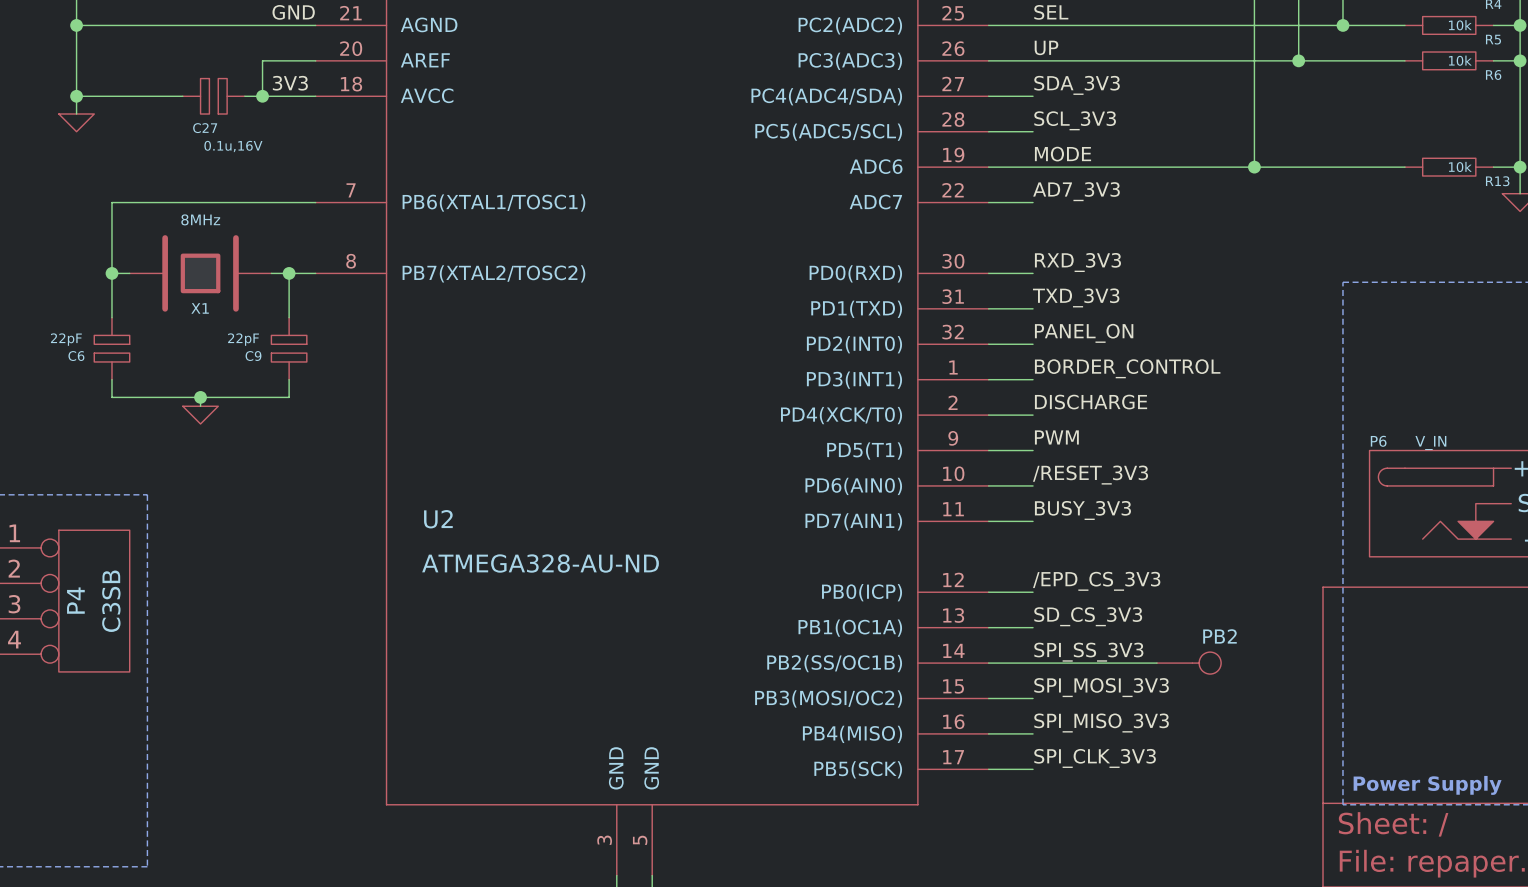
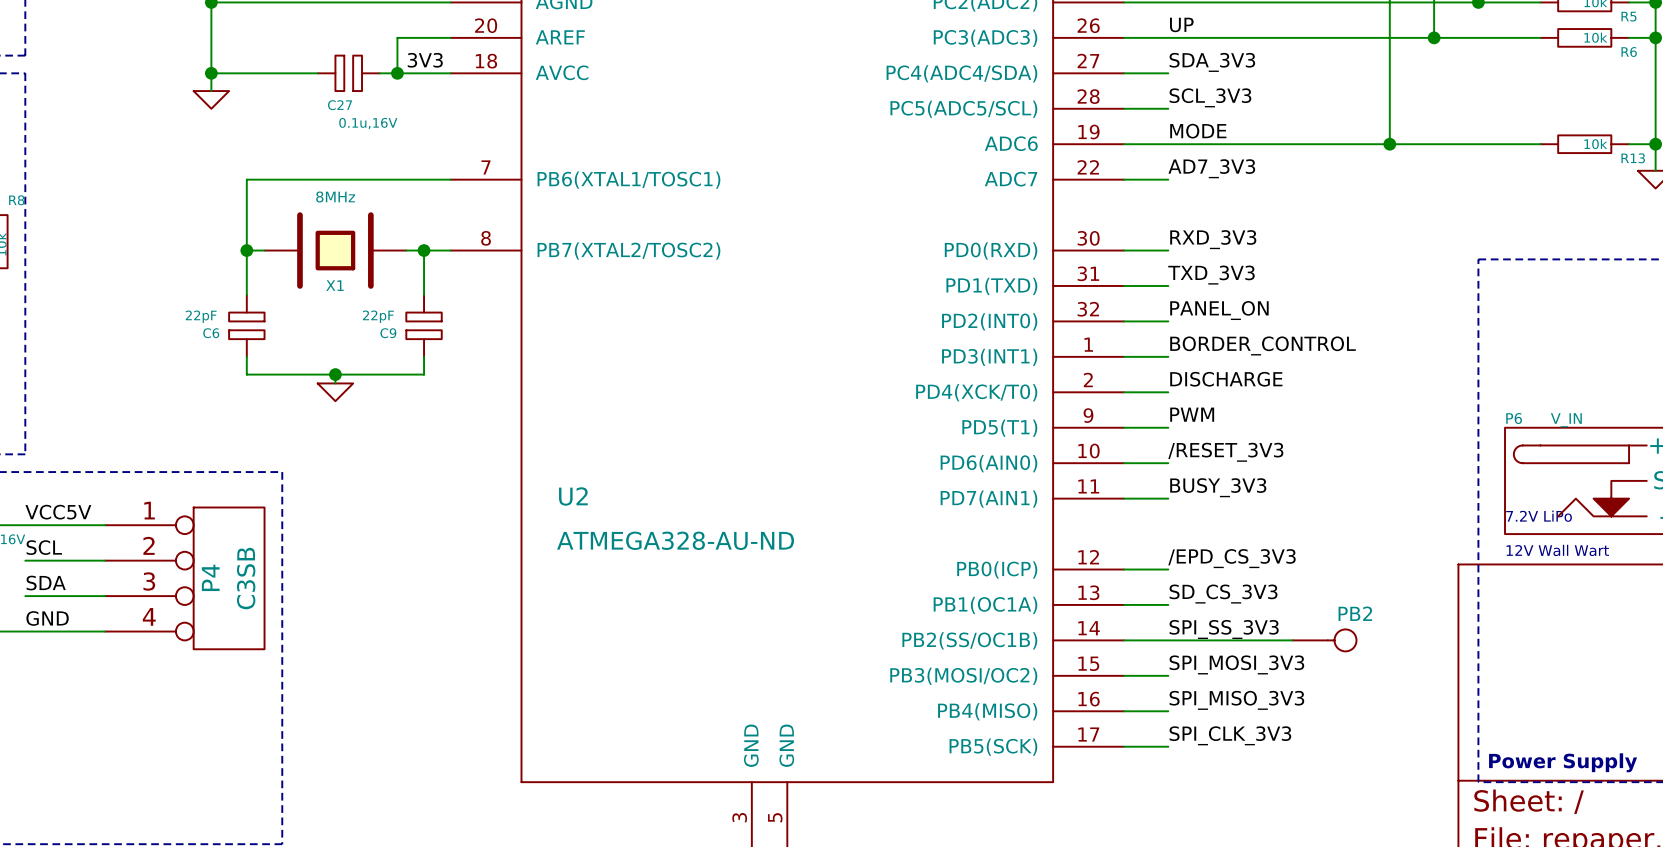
text: none -> 7.2V LiPo (1539, 516)
text: none -> 12V Wall Wart (1557, 550)

